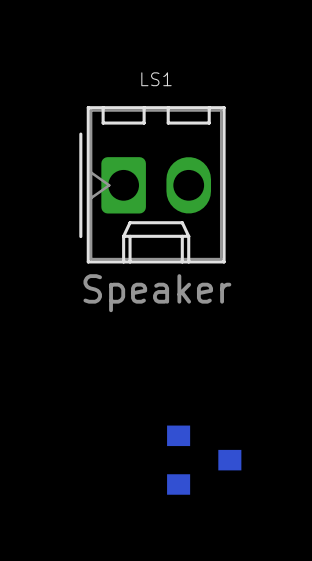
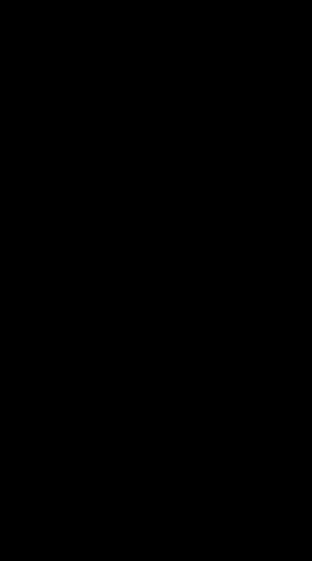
LS1: Speaker (152, 184) -> none
part: (204, 460) -> none

